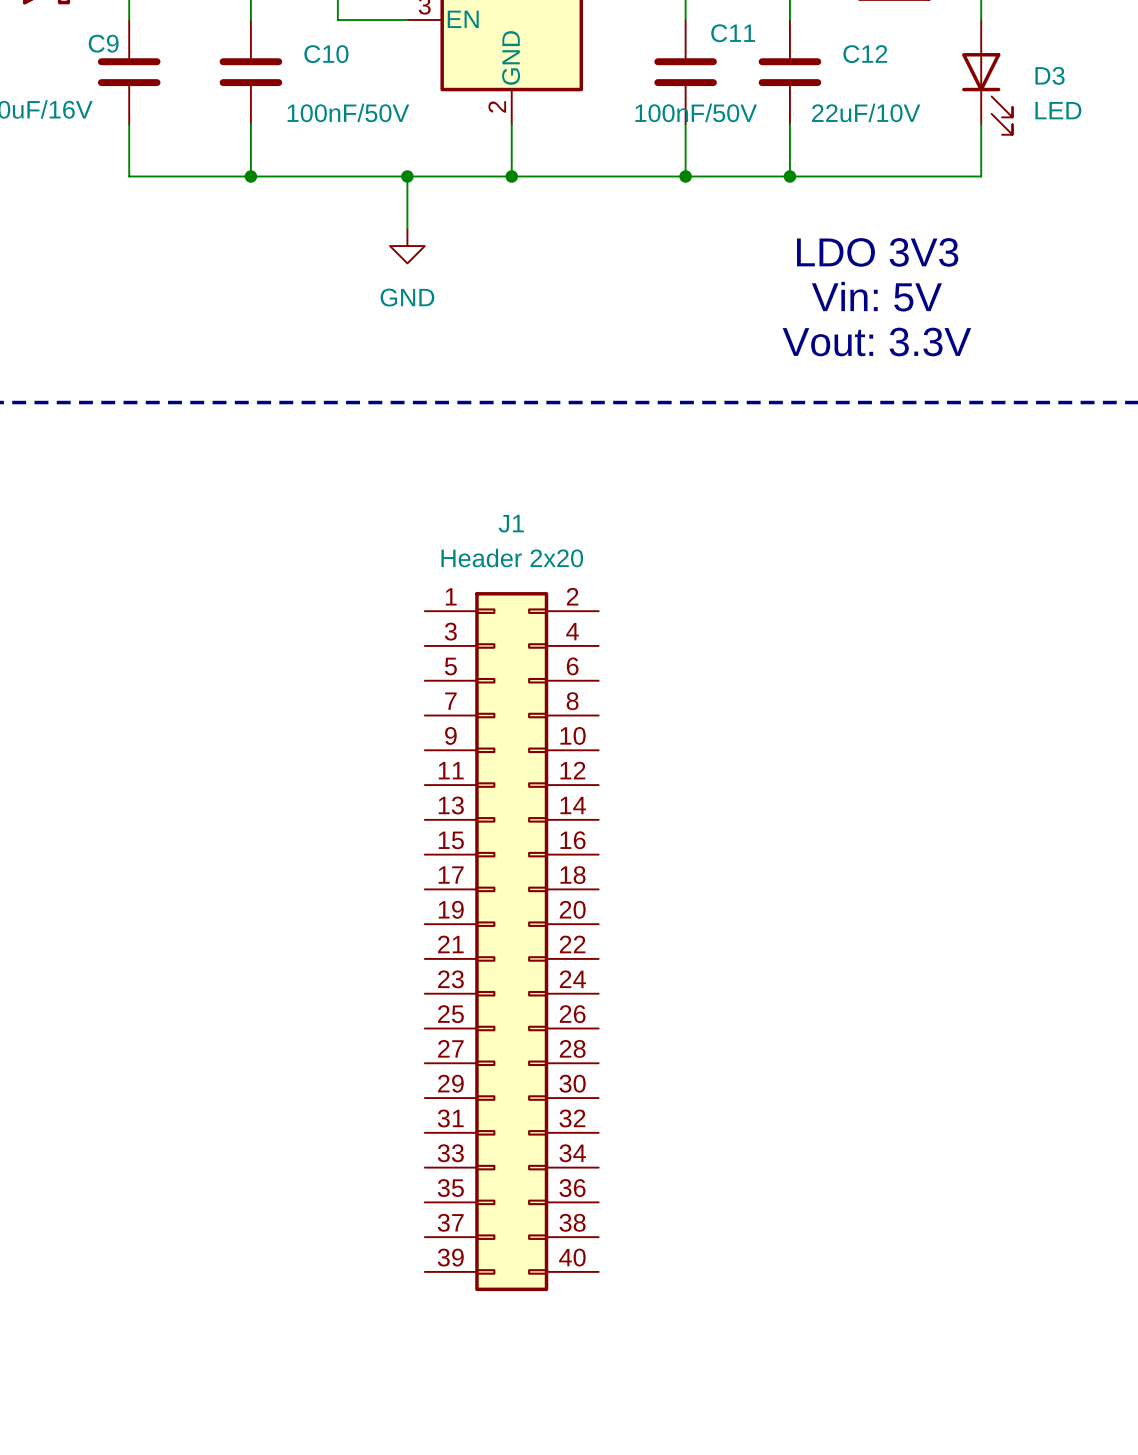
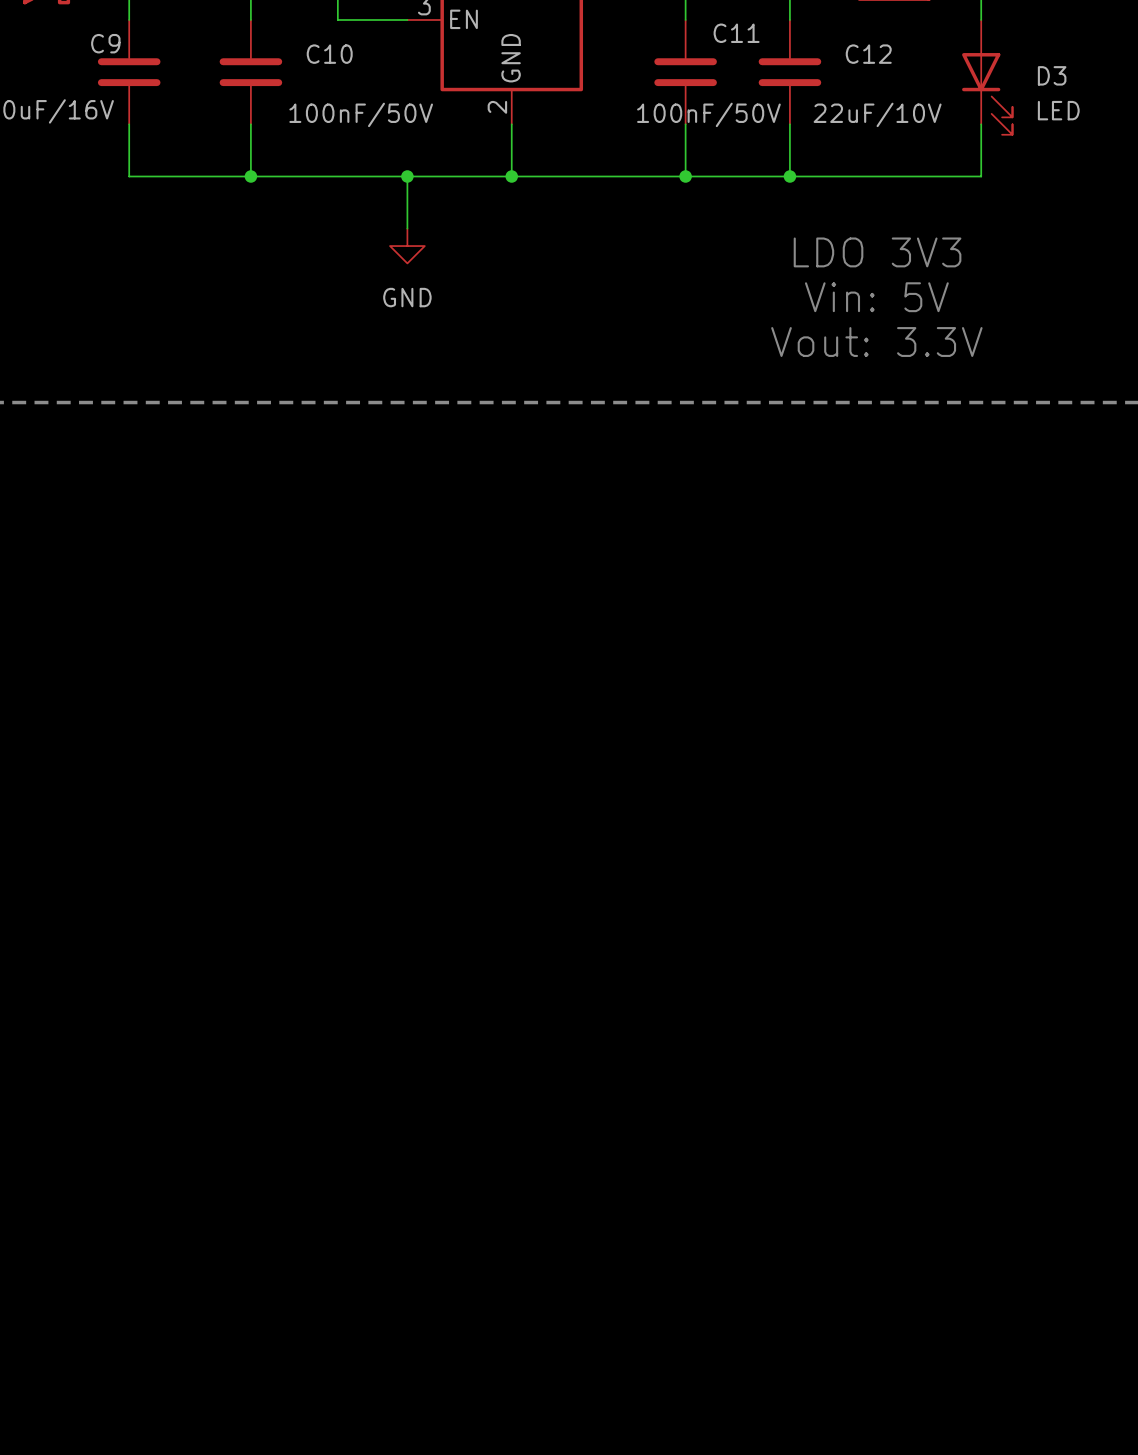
J1: Header 2x20 (511, 941) -> none

